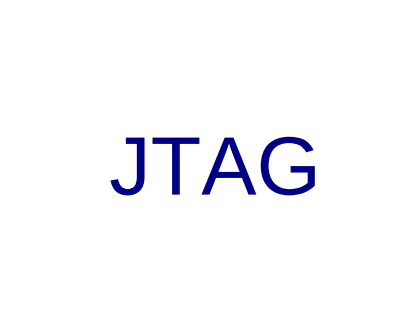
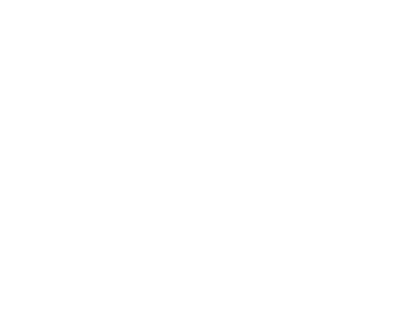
text: JTAG (212, 166) -> none

